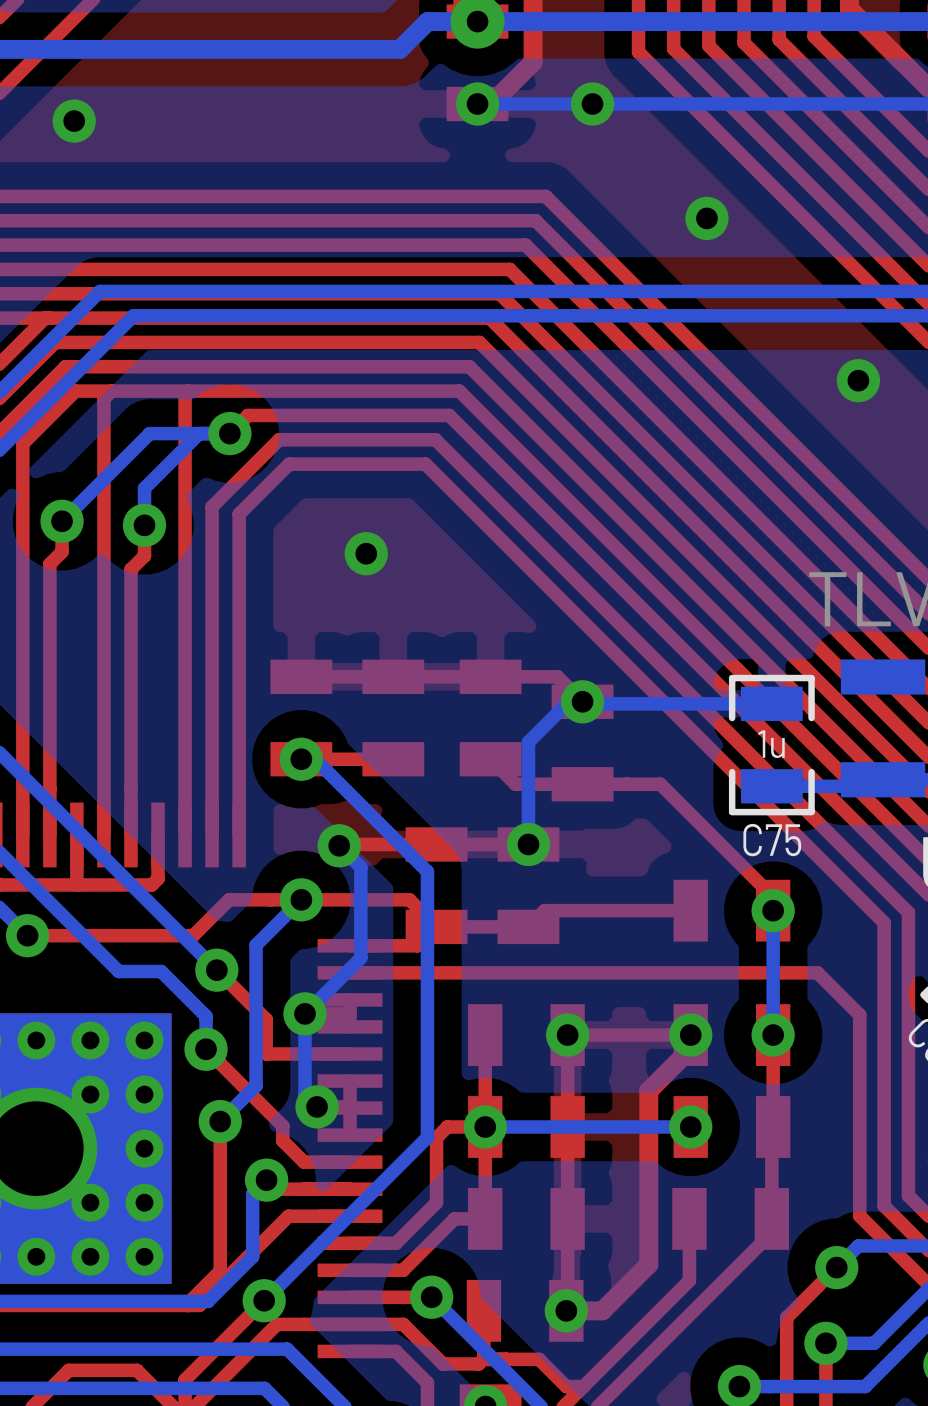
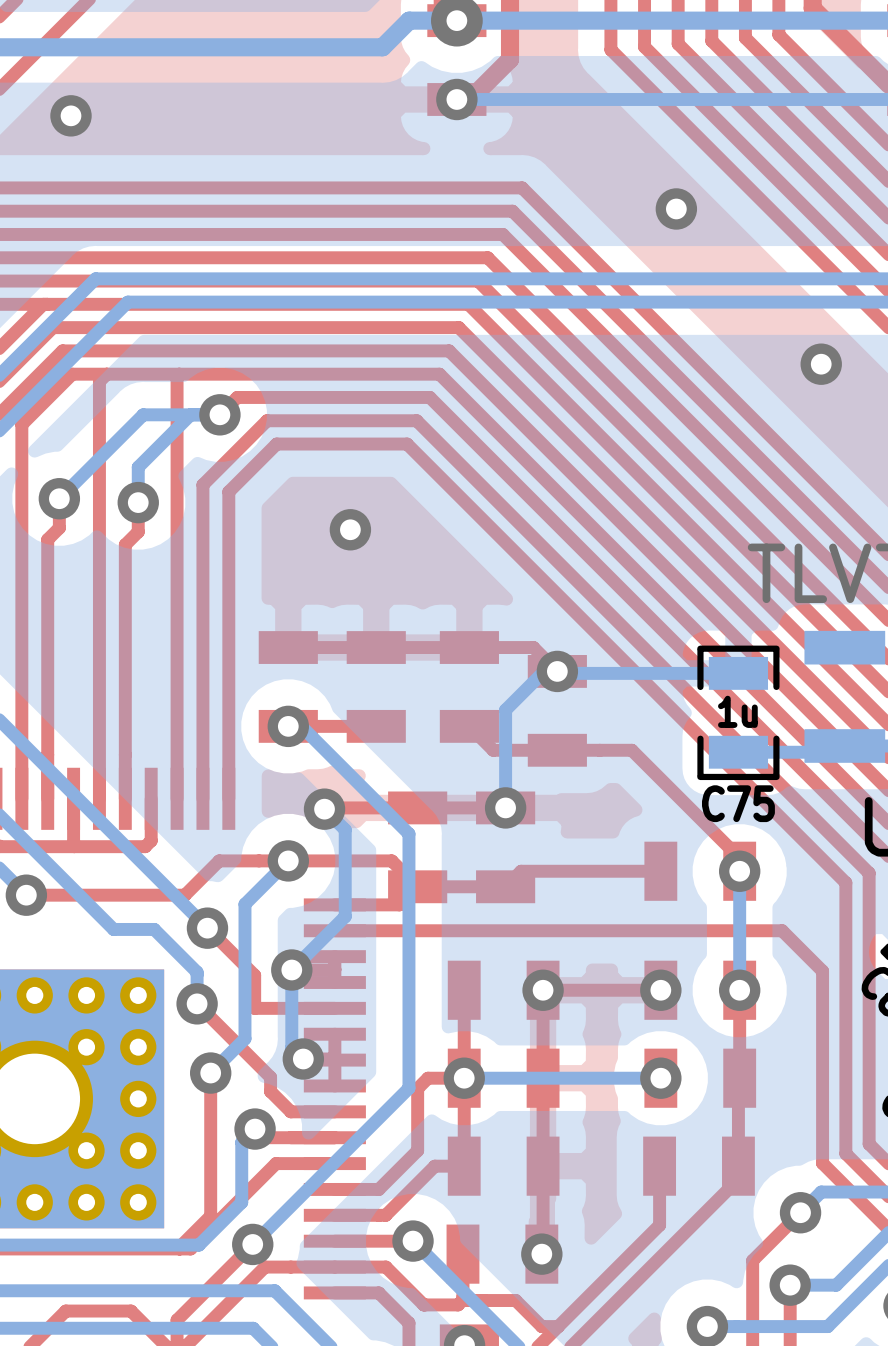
via: (592, 103) -> none
top track: (690, 1035) (690, 1048) (648, 1090) (648, 1264) (602, 1310) (566, 1310) -> none

